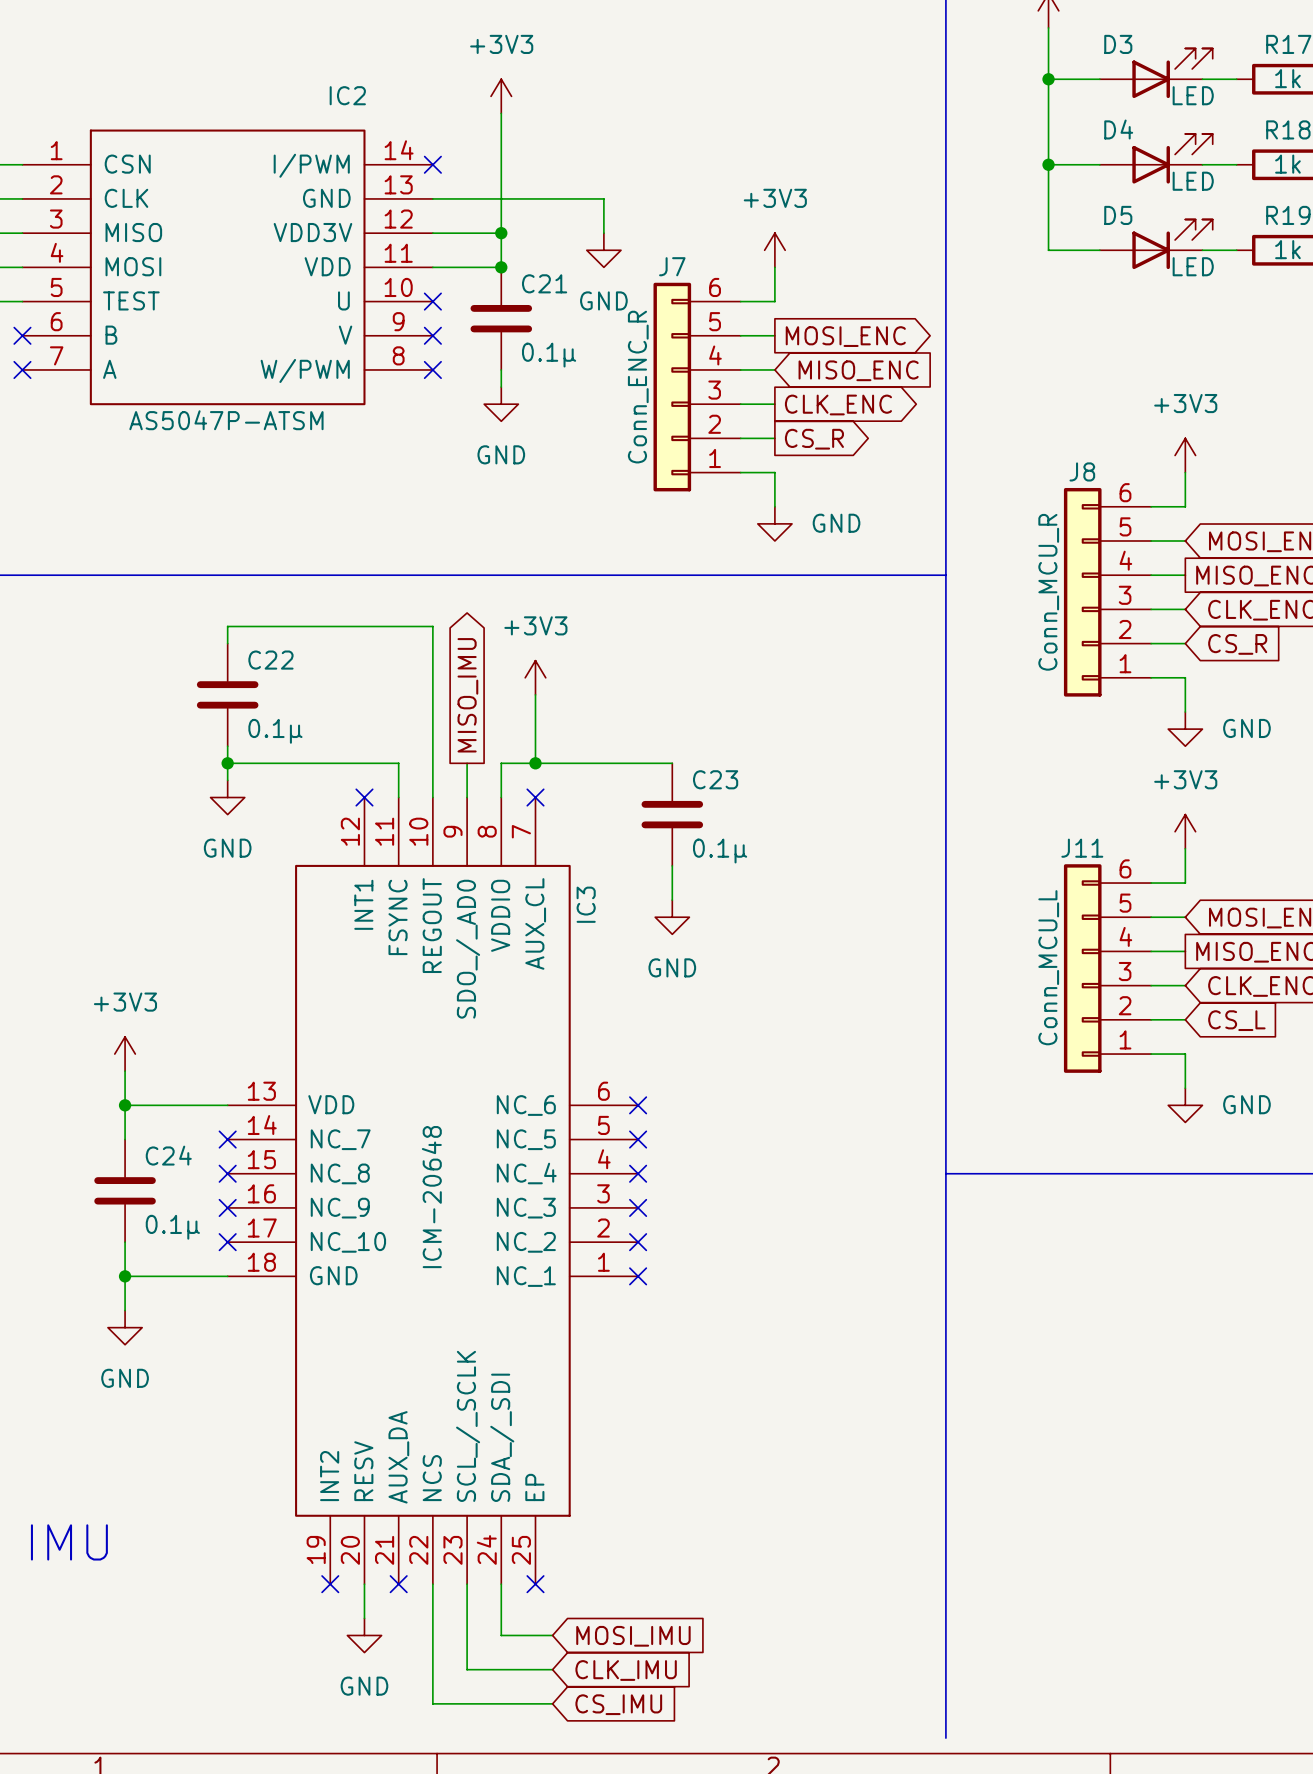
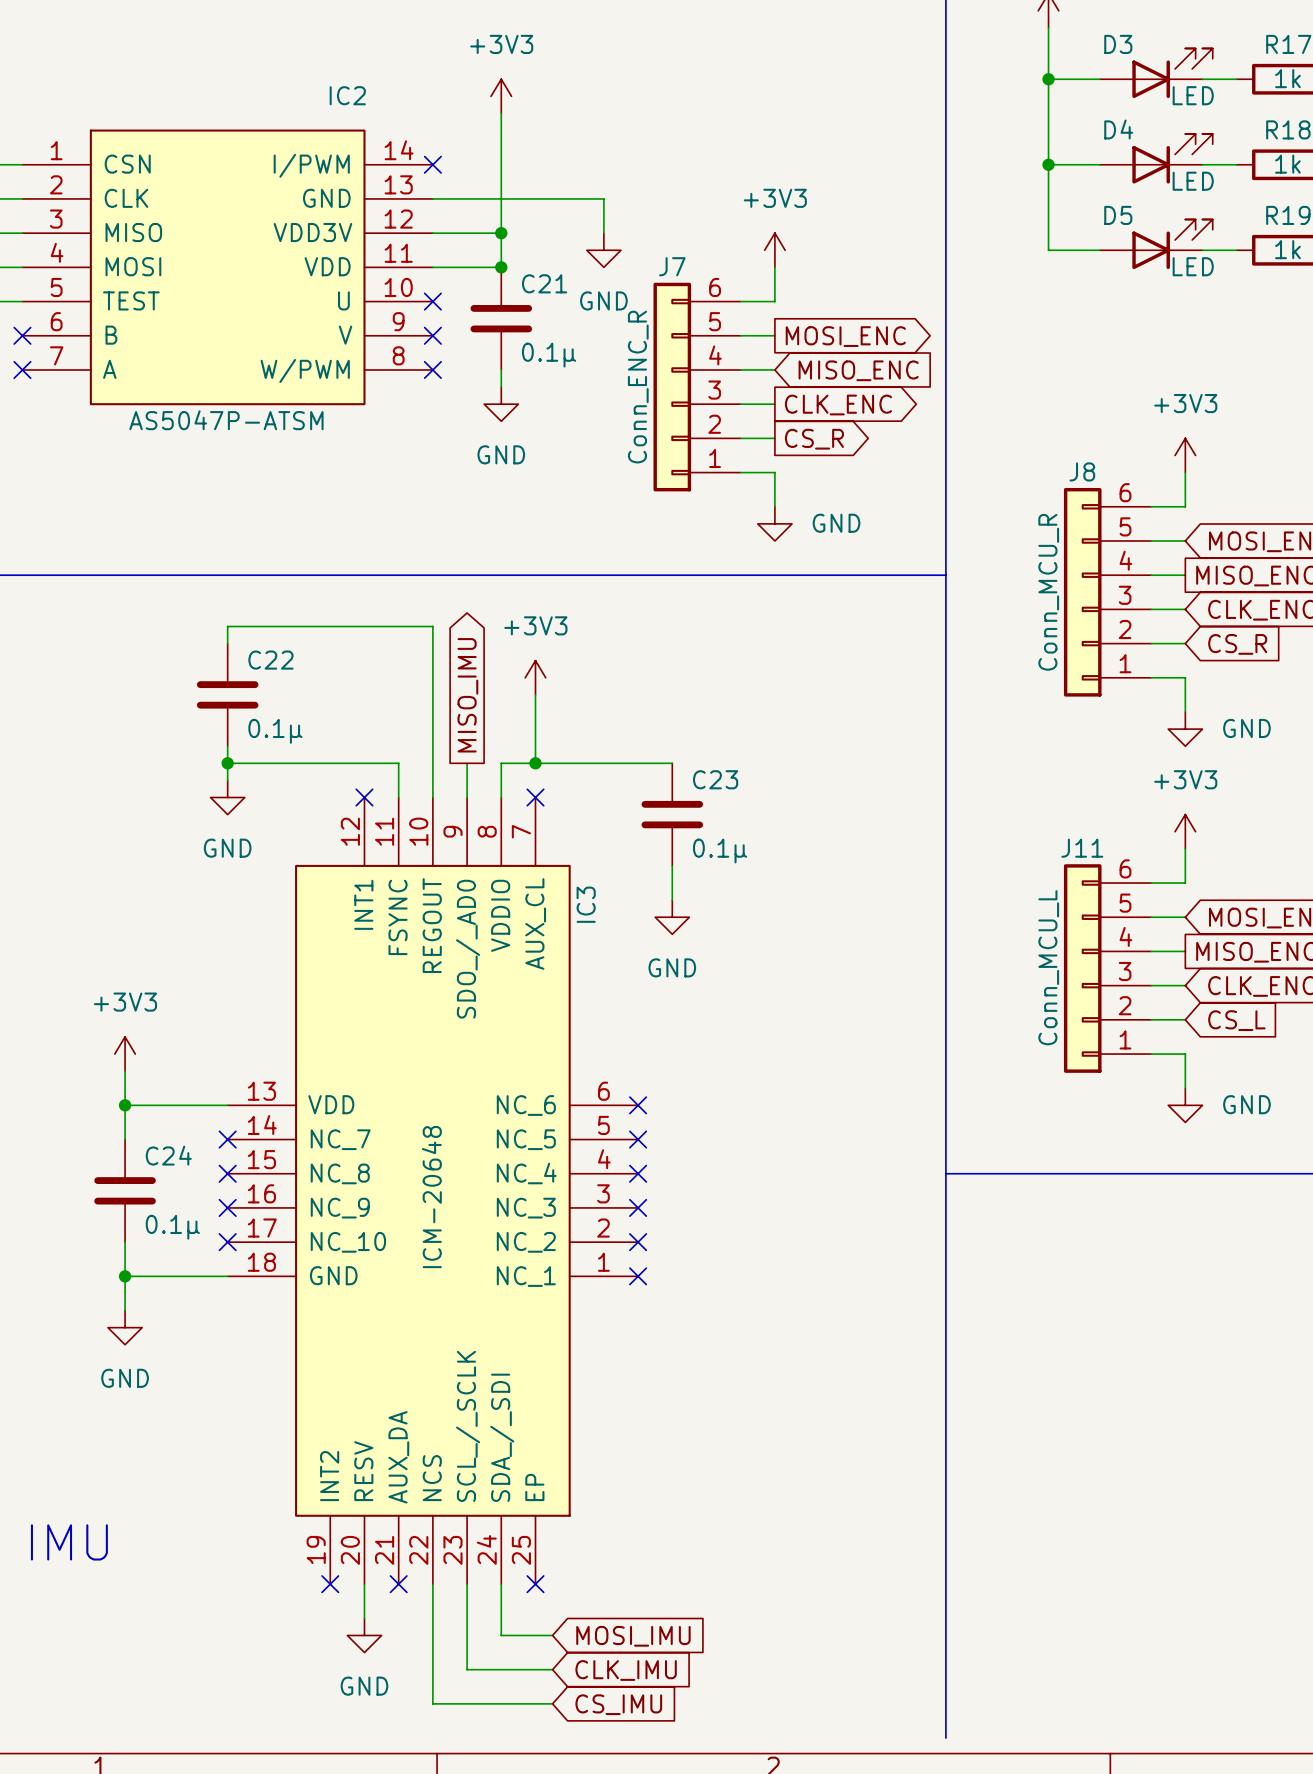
IC2 symbol: [22, 129, 433, 406] -> [22, 129, 433, 406]
IC3 symbol: [227, 797, 639, 1585] -> [227, 797, 639, 1585]

